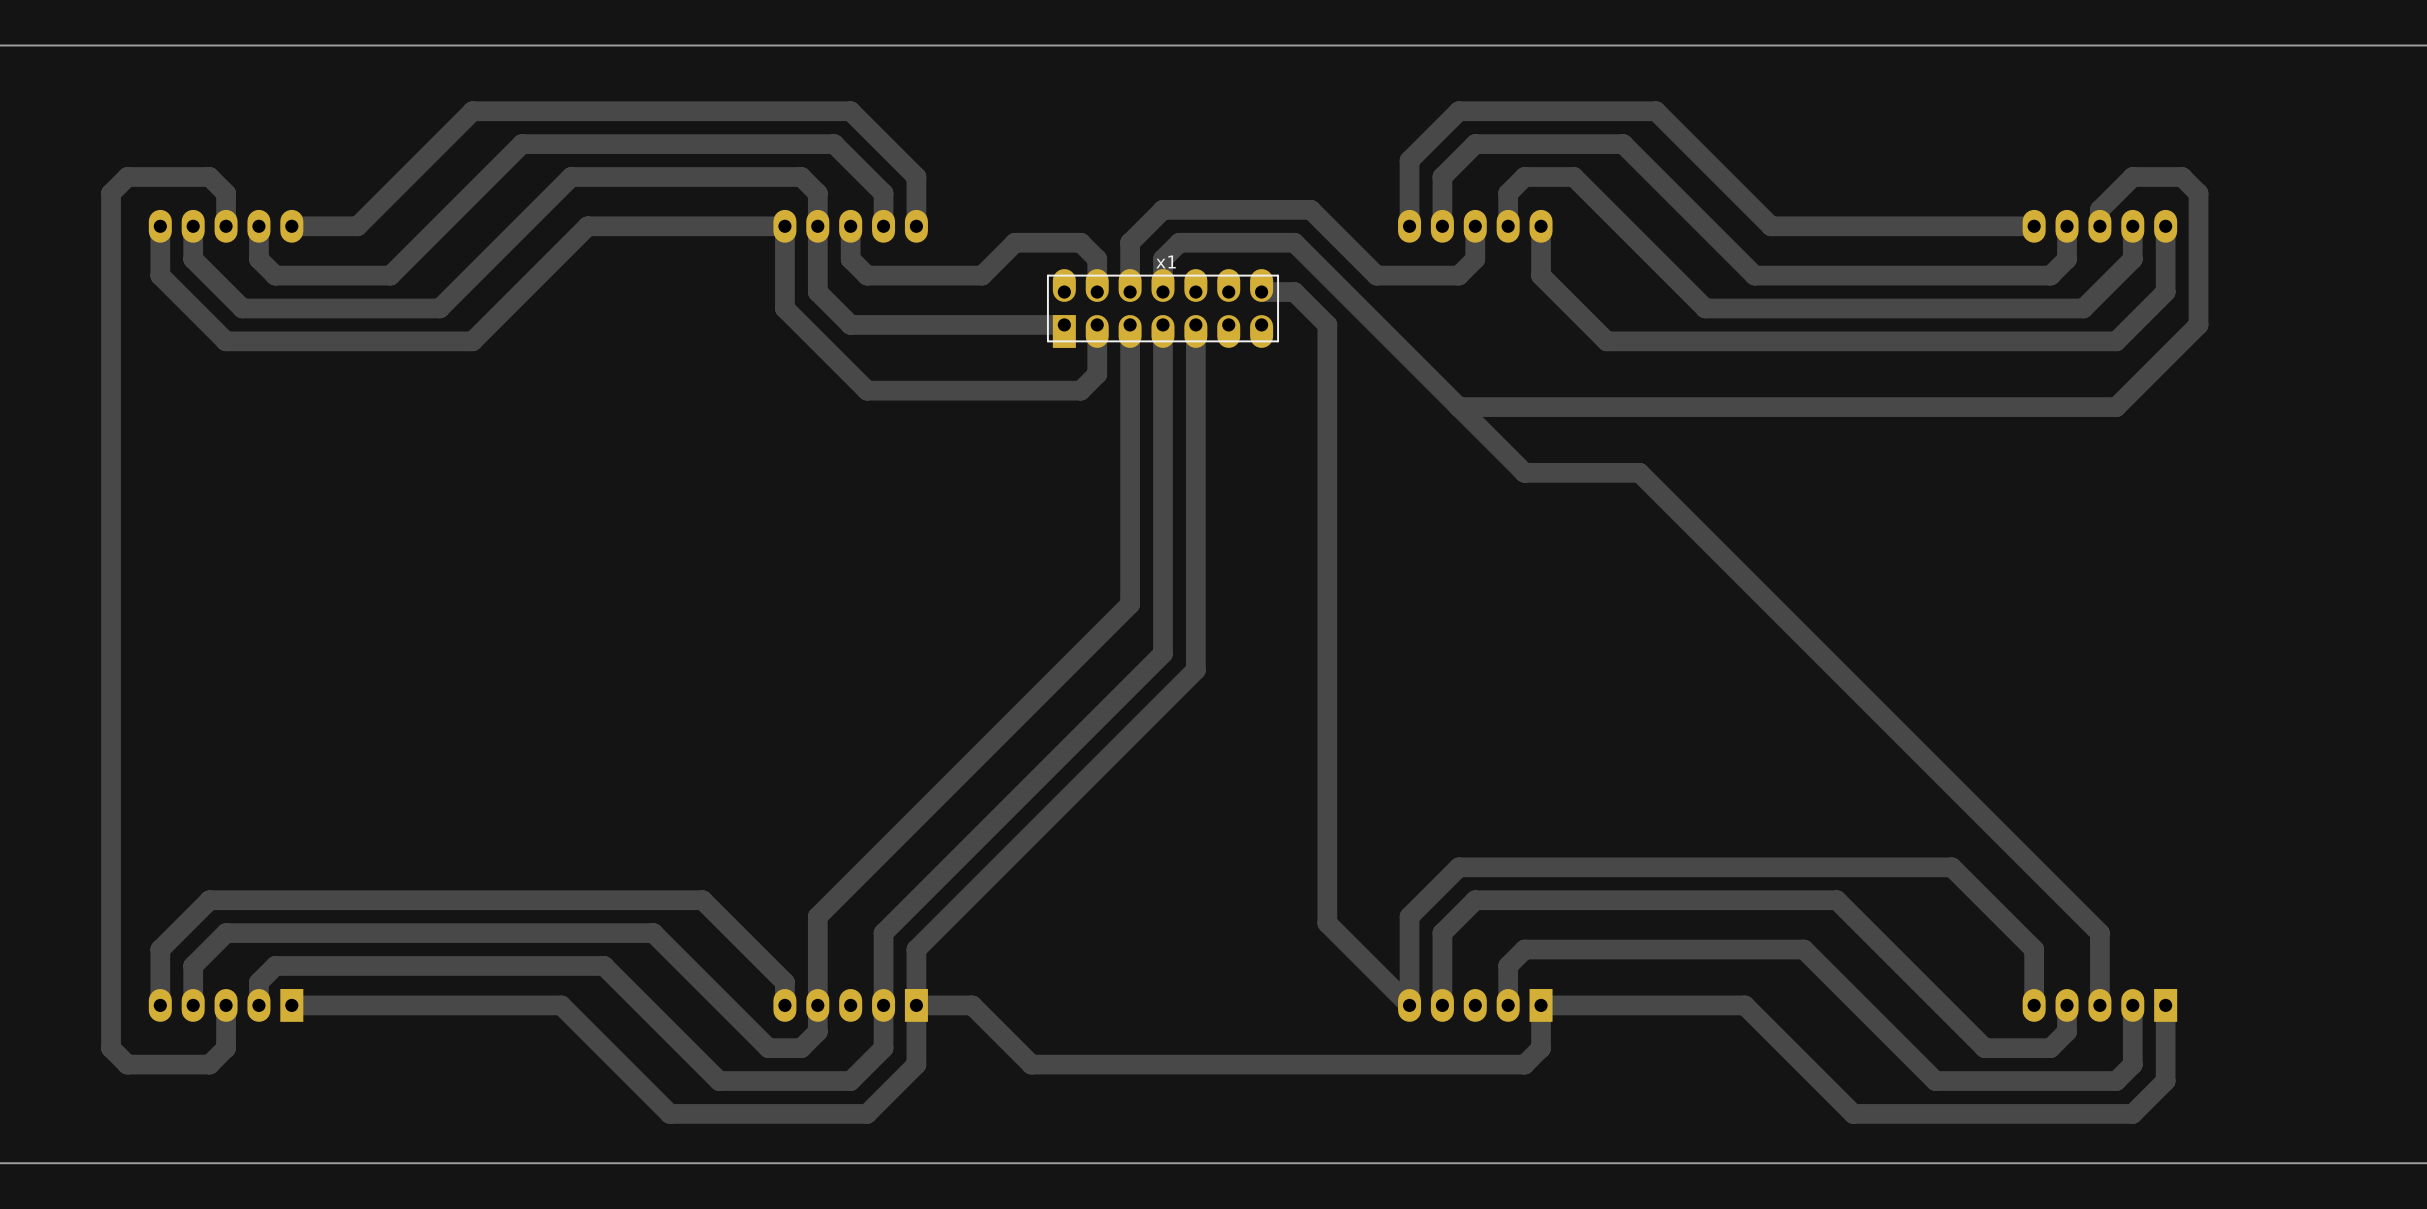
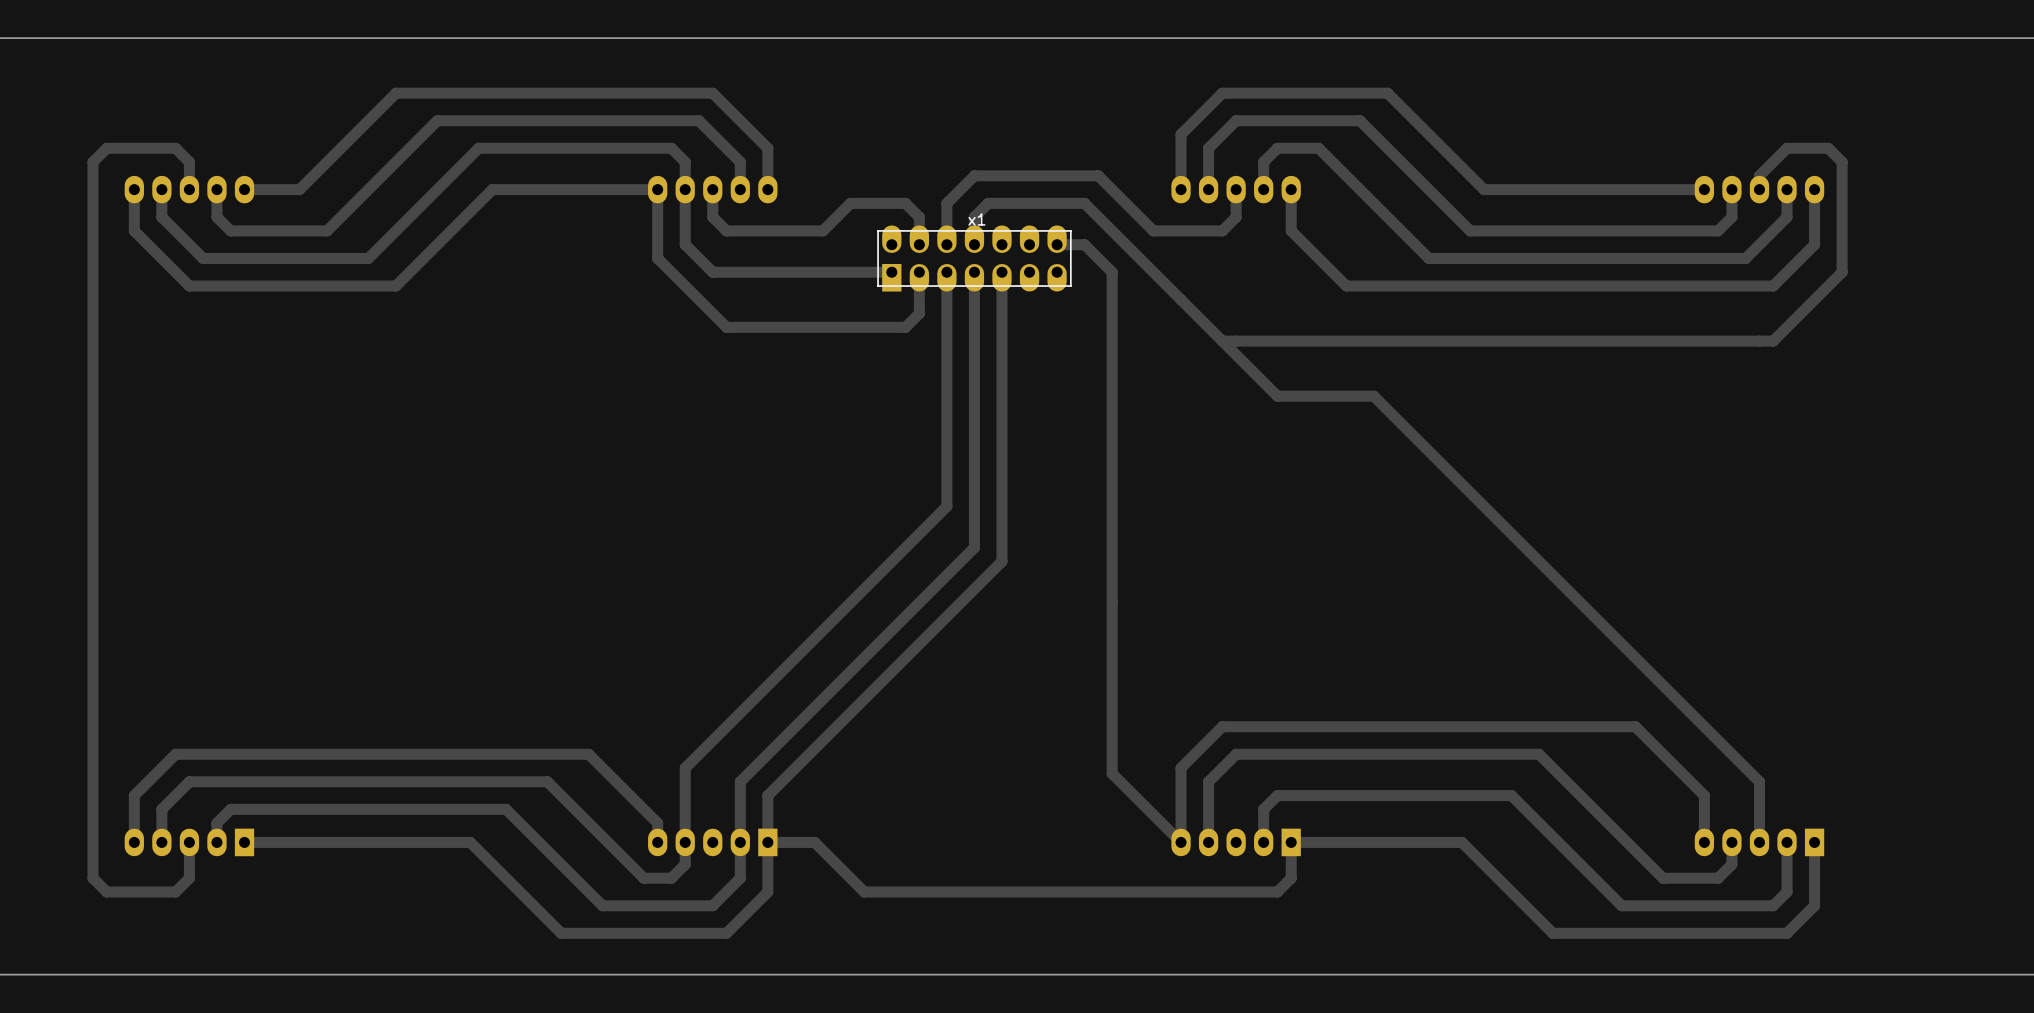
track width: thick (160, 226) (160, 275) (226, 341) (472, 341) (587, 226) (784, 226) (784, 308) (867, 390) (1080, 390) (1097, 374) (1097, 324) -> thin (134, 189) (134, 230) (189, 286) (396, 286) (492, 189) (657, 189) (657, 258) (726, 327) (905, 327) (919, 313) (919, 272)
track width: thick (193, 226) (193, 259) (242, 308) (439, 308) (571, 176) (801, 176) (817, 193) (817, 292) (850, 324) (1064, 324) -> thin (161, 189) (161, 217) (203, 258) (368, 258) (478, 148) (671, 148) (685, 162) (685, 244) (712, 272) (891, 272)
track width: thick (226, 226) (226, 193) (209, 176) (127, 176) (111, 193) (111, 1048) (127, 1064) (209, 1064) (226, 1048) (226, 1005) -> thin (189, 189) (189, 162) (175, 148) (106, 148) (93, 162) (93, 878) (106, 892) (175, 892) (189, 878) (189, 842)
track width: thick (850, 226) (850, 259) (867, 275) (982, 275) (1015, 242) (1080, 242) (1097, 259) (1097, 292) -> thin (712, 189) (712, 217) (726, 230) (822, 230) (850, 203) (905, 203) (919, 217) (919, 244)
track width: thick (883, 226) (883, 193) (834, 144) (521, 144) (390, 275) (275, 275) (258, 259) (258, 226) -> thin (740, 189) (740, 162) (699, 120) (437, 120) (327, 230) (230, 230) (216, 217) (216, 189)
track width: thick (916, 226) (916, 176) (850, 111) (472, 111) (357, 226) (291, 226) -> thin (767, 189) (767, 148) (712, 93) (396, 93) (299, 189) (244, 189)
track width: thick (1475, 226) (1475, 259) (1458, 275) (1376, 275) (1310, 209) (1162, 209) (1130, 242) (1130, 292) -> thin (1236, 189) (1236, 217) (1222, 230) (1153, 230) (1098, 175) (974, 175) (946, 203) (946, 244)
track width: thick (2034, 226) (1771, 226) (1656, 111) (1458, 111) (1409, 160) (1409, 226) -> thin (1704, 189) (1484, 189) (1387, 93) (1222, 93) (1181, 134) (1181, 189)
track width: thick (2067, 226) (2067, 259) (2050, 275) (1754, 275) (1623, 144) (1475, 144) (1442, 176) (1442, 226) -> thin (1731, 189) (1731, 217) (1718, 230) (1470, 230) (1360, 120) (1236, 120) (1208, 148) (1208, 189)
track width: thick (2099, 226) (2099, 209) (2132, 176) (2182, 176) (2198, 193) (2198, 324) (2116, 407) (1458, 407) -> thin (1759, 189) (1759, 175) (1787, 148) (1828, 148) (1842, 162) (1842, 272) (1773, 341) (1222, 341)
track width: thick (2132, 226) (2132, 259) (2083, 308) (1705, 308) (1573, 176) (1524, 176) (1508, 193) (1508, 226) -> thin (1787, 189) (1787, 217) (1745, 258) (1428, 258) (1318, 148) (1277, 148) (1263, 162) (1263, 189)
track width: thick (2165, 226) (2165, 292) (2116, 341) (1606, 341) (1541, 275) (1541, 226) -> thin (1814, 189) (1814, 244) (1773, 286) (1346, 286) (1291, 230) (1291, 189)
track width: thick (1162, 292) (1162, 259) (1179, 242) (1294, 242) (1524, 472) (1639, 472) (2099, 933) (2099, 1005) -> thin (974, 244) (974, 217) (988, 203) (1084, 203) (1277, 396) (1373, 396) (1759, 781) (1759, 842)
track width: thick (1261, 292) (1294, 292) (1327, 324) (1327, 923) (1409, 1005) (1409, 916) (1458, 867) (1951, 867) (2034, 949) (2034, 1005) -> thin (1057, 244) (1084, 244) (1112, 272) (1112, 773) (1181, 842) (1181, 768) (1222, 726) (1635, 726) (1704, 795) (1704, 842)
track width: thick (1130, 324) (1130, 604) (817, 916) (817, 1031) (801, 1048) (768, 1048) (653, 933) (226, 933) (193, 965) (193, 1005) -> thin (946, 272) (946, 506) (685, 768) (685, 864) (671, 878) (643, 878) (547, 781) (189, 781) (161, 809) (161, 842)
track width: thick (1162, 324) (1162, 653) (883, 933) (883, 1048) (850, 1081) (719, 1081) (604, 965) (275, 965) (258, 982) (258, 1005) -> thin (974, 272) (974, 547) (740, 781) (740, 878) (712, 905) (602, 905) (506, 809) (230, 809) (216, 823) (216, 842)
track width: thick (1195, 324) (1195, 670) (916, 949) (916, 1064) (867, 1113) (669, 1113) (561, 1005) (291, 1005) -> thin (1001, 272) (1001, 561) (767, 795) (767, 892) (726, 933) (561, 933) (470, 842) (244, 842)
track width: thick (784, 1005) (784, 982) (702, 900) (209, 900) (160, 949) (160, 1005) -> thin (657, 842) (657, 823) (588, 754) (175, 754) (134, 795) (134, 842)
track width: thick (2067, 1005) (2067, 1031) (2050, 1048) (1984, 1048) (1836, 900) (1475, 900) (1442, 933) (1442, 1005) -> thin (1731, 842) (1731, 864) (1718, 878) (1663, 878) (1539, 754) (1236, 754) (1208, 781) (1208, 842)
track width: thick (2132, 1005) (2132, 1064) (2116, 1081) (1935, 1081) (1804, 949) (1524, 949) (1508, 965) (1508, 1005) -> thin (1787, 842) (1787, 892) (1773, 905) (1621, 905) (1511, 795) (1277, 795) (1263, 809) (1263, 842)
track width: thick (2165, 1005) (2165, 1081) (2132, 1113) (1853, 1113) (1744, 1005) (1541, 1005) (1541, 1048) (1524, 1064) (1031, 1064) (972, 1005) (916, 1005) -> thin (1814, 842) (1814, 905) (1787, 933) (1552, 933) (1461, 842) (1291, 842) (1291, 878) (1277, 892) (864, 892) (814, 842) (767, 842)

